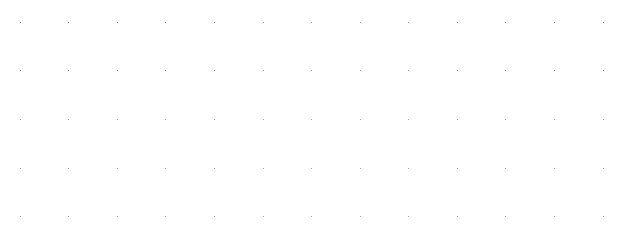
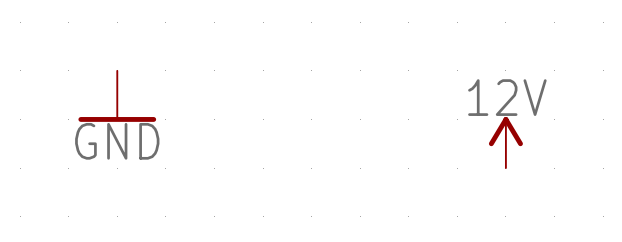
power symbol: none -> GND (117, 96)
power symbol: none -> 12V (505, 142)

